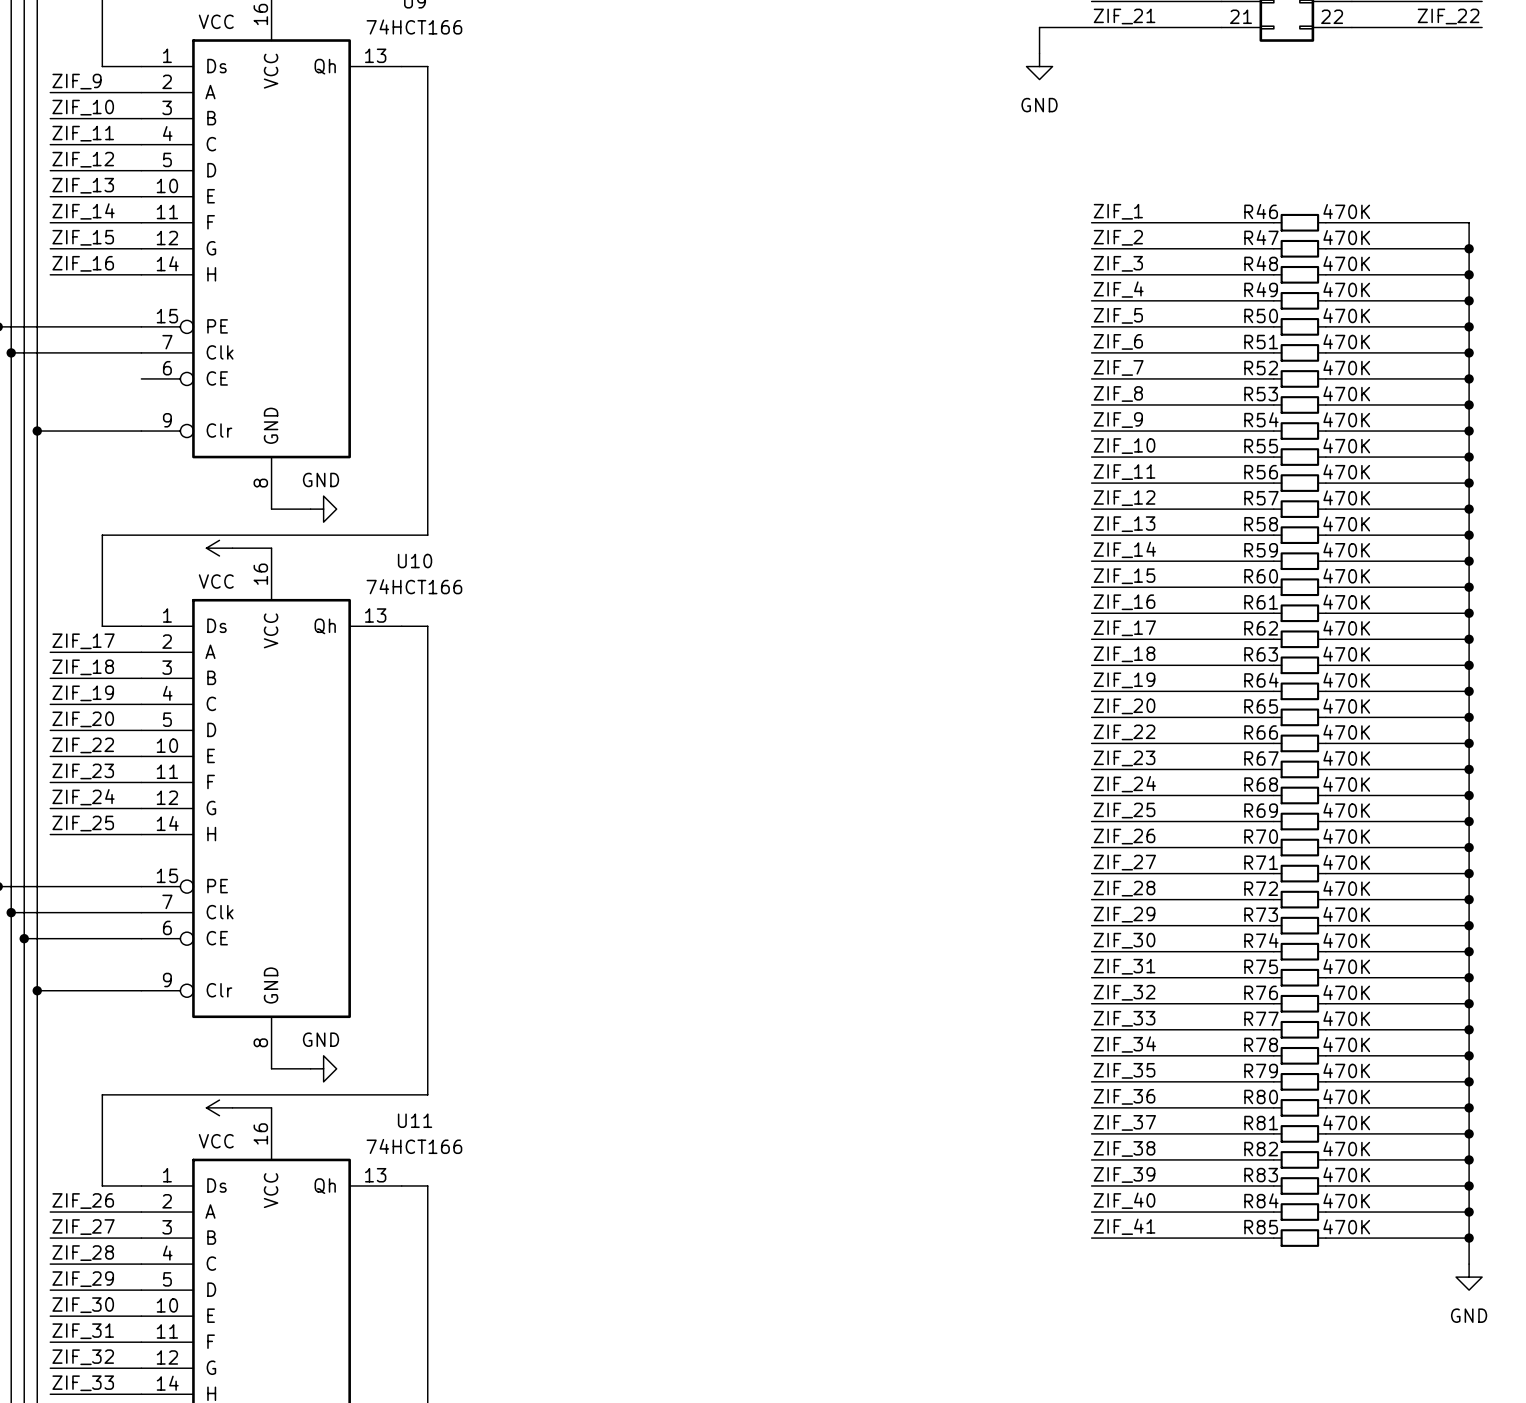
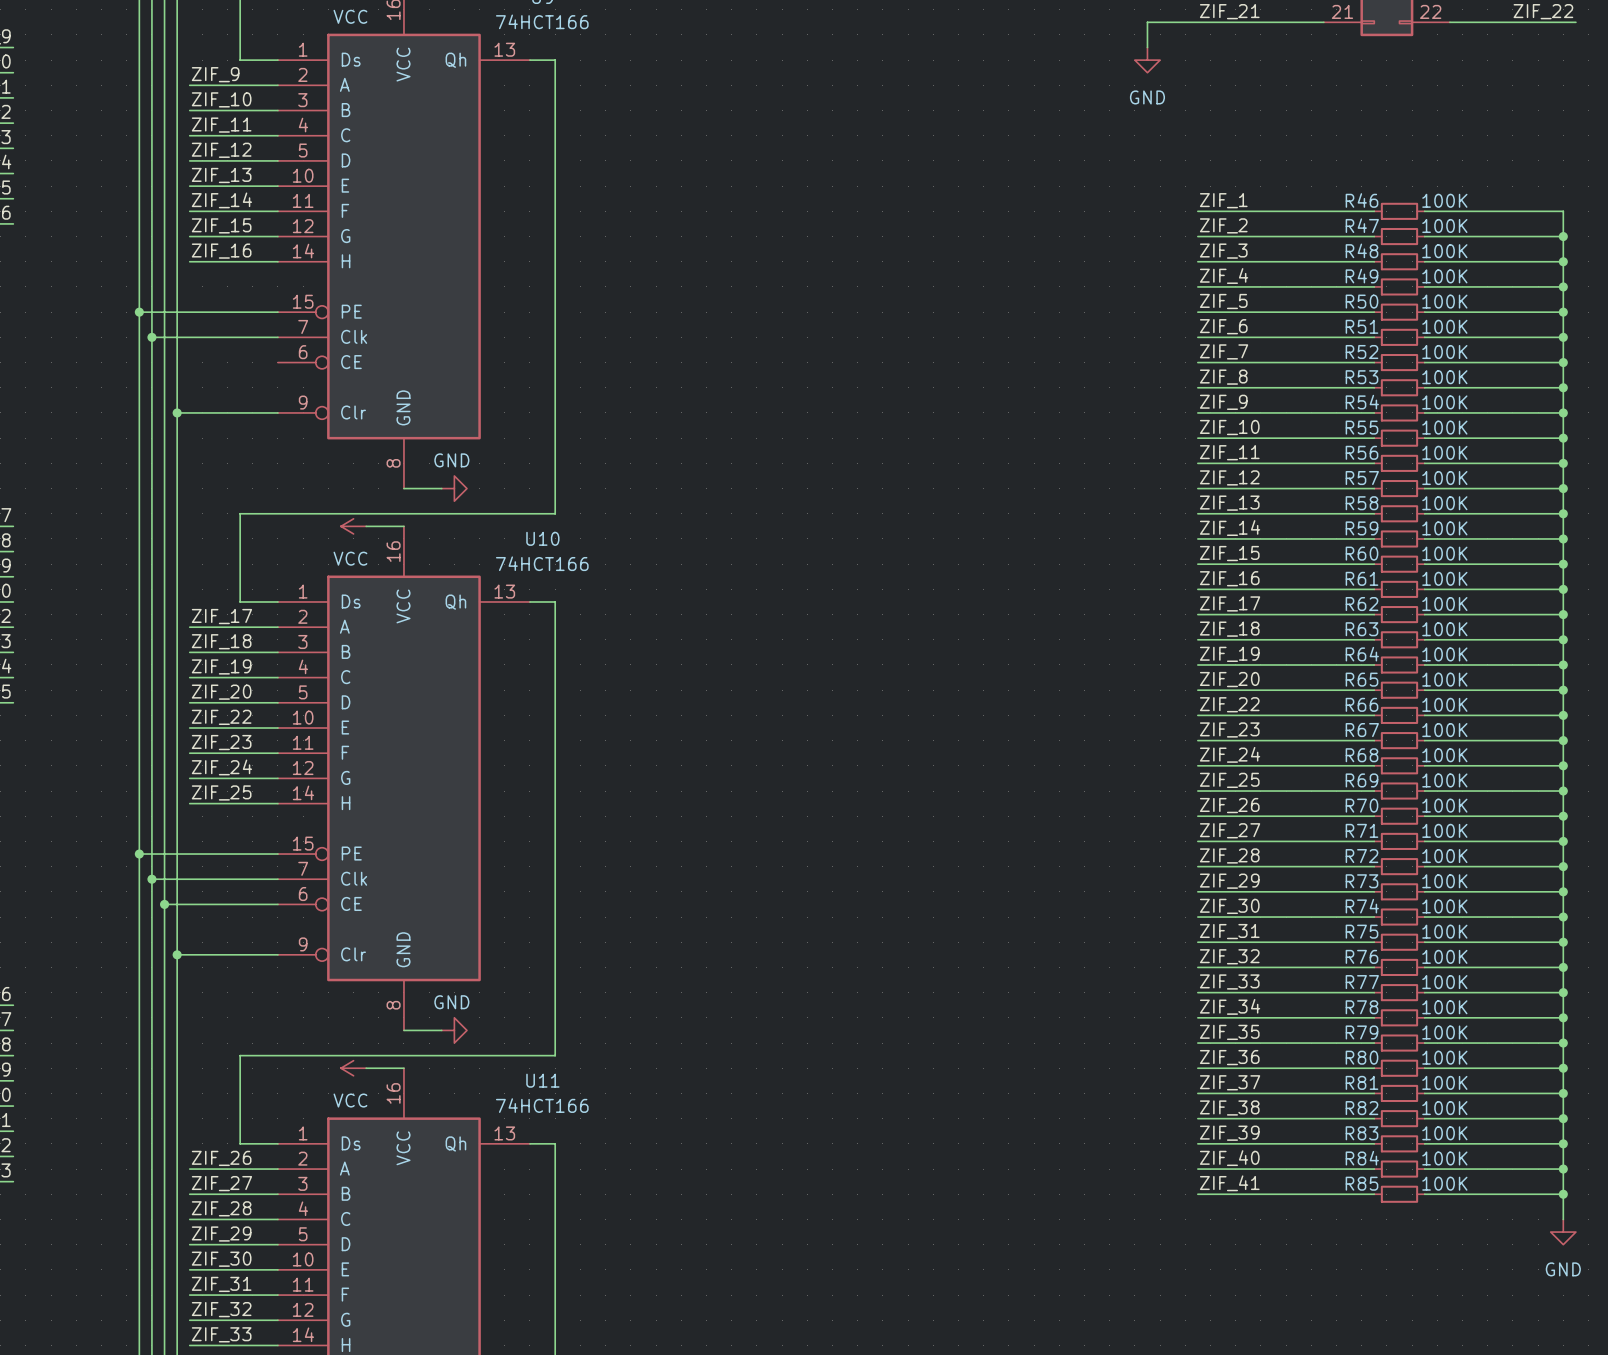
R46 value: 470K (1346, 211) -> 100K (1444, 200)
R47 value: 470K (1346, 237) -> 100K (1444, 225)
R48 value: 470K (1346, 263) -> 100K (1444, 251)
R49 value: 470K (1346, 289) -> 100K (1444, 276)
R50 value: 470K (1346, 315) -> 100K (1444, 301)
R51 value: 470K (1346, 341) -> 100K (1444, 326)
R52 value: 470K (1346, 367) -> 100K (1444, 352)
R53 value: 470K (1346, 393) -> 100K (1444, 377)
R54 value: 470K (1346, 419) -> 100K (1444, 402)
R55 value: 470K (1346, 445) -> 100K (1444, 427)
R56 value: 470K (1346, 471) -> 100K (1444, 452)
R57 value: 470K (1346, 497) -> 100K (1444, 478)
R58 value: 470K (1346, 523) -> 100K (1444, 503)
R59 value: 470K (1346, 549) -> 100K (1444, 528)
R60 value: 470K (1346, 576) -> 100K (1444, 553)
R61 value: 470K (1346, 602) -> 100K (1444, 578)
R62 value: 470K (1346, 628) -> 100K (1444, 604)
R63 value: 470K (1346, 654) -> 100K (1444, 629)
R64 value: 470K (1346, 680) -> 100K (1444, 654)
R65 value: 470K (1346, 706) -> 100K (1444, 679)
R66 value: 470K (1346, 732) -> 100K (1444, 704)
R67 value: 470K (1346, 758) -> 100K (1444, 730)
R68 value: 470K (1346, 784) -> 100K (1444, 755)
R69 value: 470K (1346, 810) -> 100K (1444, 780)
R70 value: 470K (1346, 836) -> 100K (1444, 805)
R71 value: 470K (1346, 862) -> 100K (1444, 830)
R72 value: 470K (1346, 888) -> 100K (1444, 856)
R73 value: 470K (1346, 914) -> 100K (1444, 881)
R74 value: 470K (1346, 940) -> 100K (1444, 906)
R75 value: 470K (1346, 966) -> 100K (1444, 931)
R76 value: 470K (1346, 992) -> 100K (1444, 956)
R77 value: 470K (1346, 1018) -> 100K (1444, 982)
R78 value: 470K (1346, 1044) -> 100K (1444, 1007)
R79 value: 470K (1346, 1070) -> 100K (1444, 1032)
R80 value: 470K (1346, 1096) -> 100K (1444, 1057)
R81 value: 470K (1346, 1122) -> 100K (1444, 1082)
R82 value: 470K (1346, 1148) -> 100K (1444, 1108)
R83 value: 470K (1346, 1174) -> 100K (1444, 1133)
R84 value: 470K (1346, 1200) -> 100K (1444, 1158)
R85 value: 470K (1346, 1226) -> 100K (1444, 1183)

